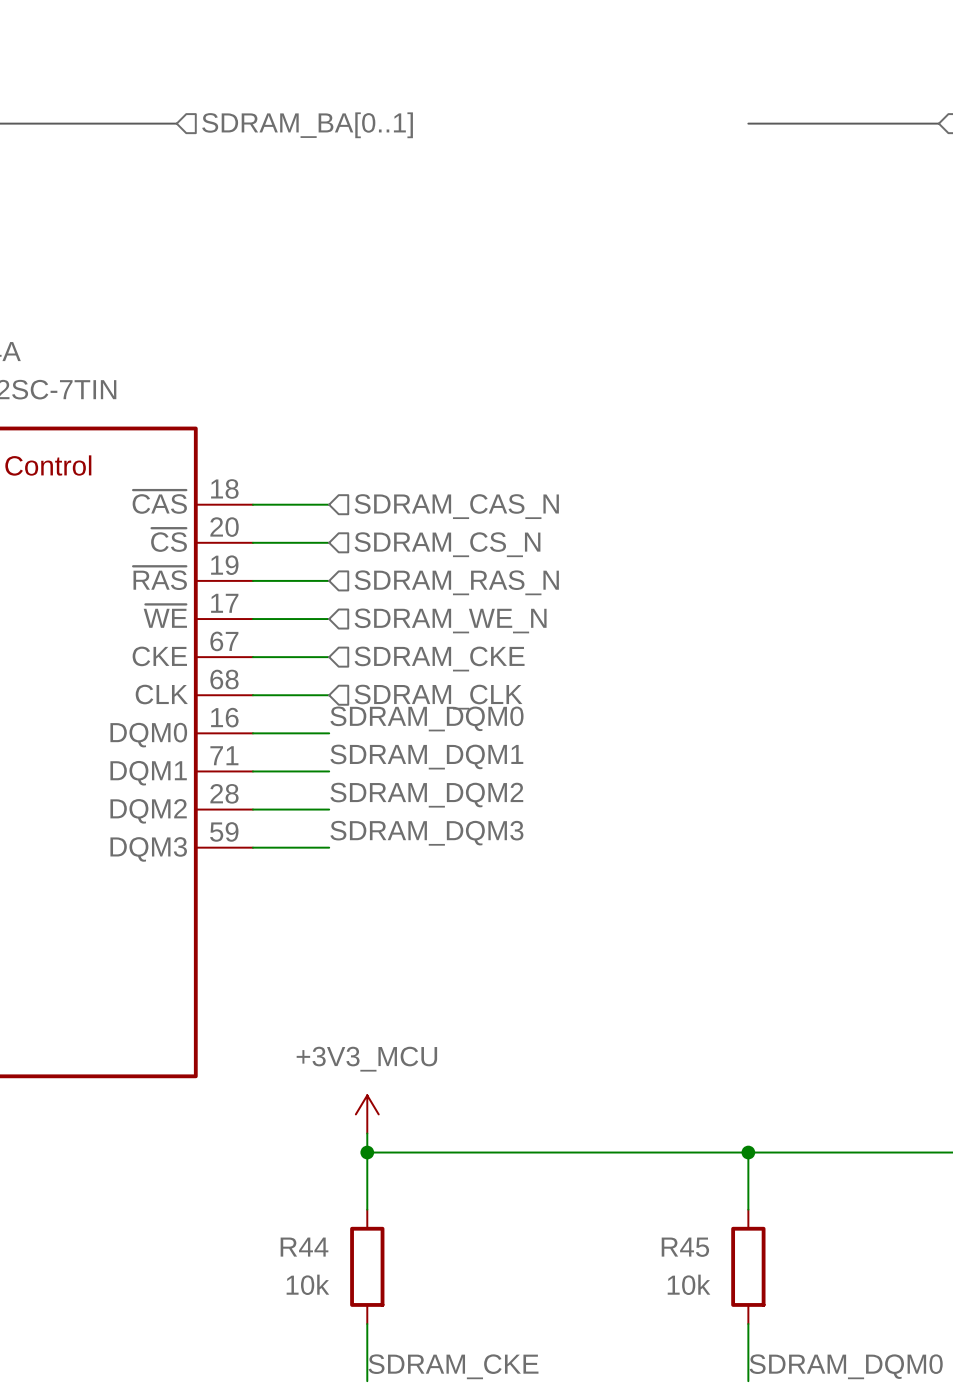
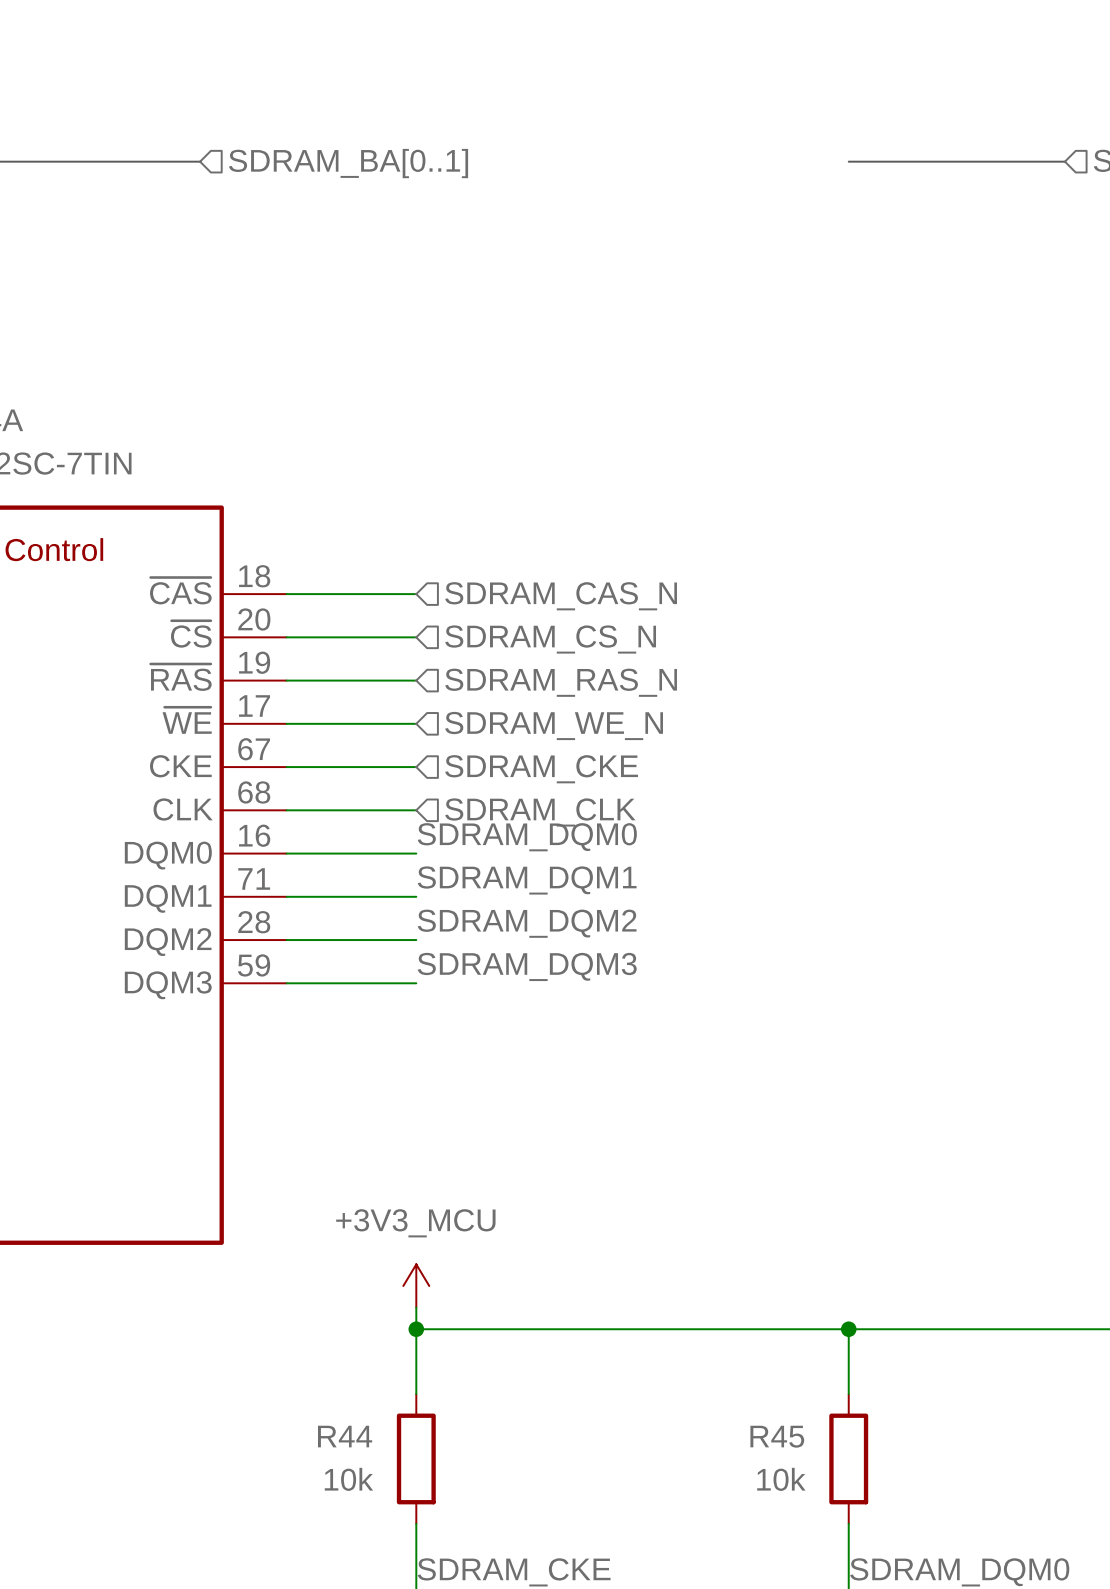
wire: none -> (373, 594) (416, 594)
hierarchical label position: SDRAM_CAS_N (456, 506) -> SDRAM_CAS_N (561, 596)
wire: none -> (373, 637) (416, 637)
hierarchical label position: SDRAM_CS_N (447, 544) -> SDRAM_CS_N (550, 639)
wire: none -> (373, 680) (416, 680)
hierarchical label position: SDRAM_RAS_N (456, 582) -> SDRAM_RAS_N (561, 682)
wire: none -> (373, 723) (416, 723)
hierarchical label position: SDRAM_WE_N (450, 620) -> SDRAM_WE_N (554, 725)
wire: none -> (373, 767) (416, 767)
hierarchical label position: SDRAM_CKE (439, 659) -> SDRAM_CKE (541, 769)
wire: none -> (373, 810) (416, 810)
hierarchical label position: SDRAM_CLK (438, 697) -> SDRAM_CLK (540, 812)
label position: SDRAM_DQM0 (426, 718) -> SDRAM_DQM0 (527, 837)
wire: none -> (373, 853) (416, 853)
label position: SDRAM_DQM1 (426, 757) -> SDRAM_DQM1 (527, 880)
wire: none -> (373, 896) (416, 896)
label position: SDRAM_DQM2 (426, 795) -> SDRAM_DQM2 (527, 923)
wire: none -> (373, 940) (416, 940)
label position: SDRAM_DQM3 (426, 833) -> SDRAM_DQM3 (527, 966)
wire: none -> (373, 983) (416, 983)

